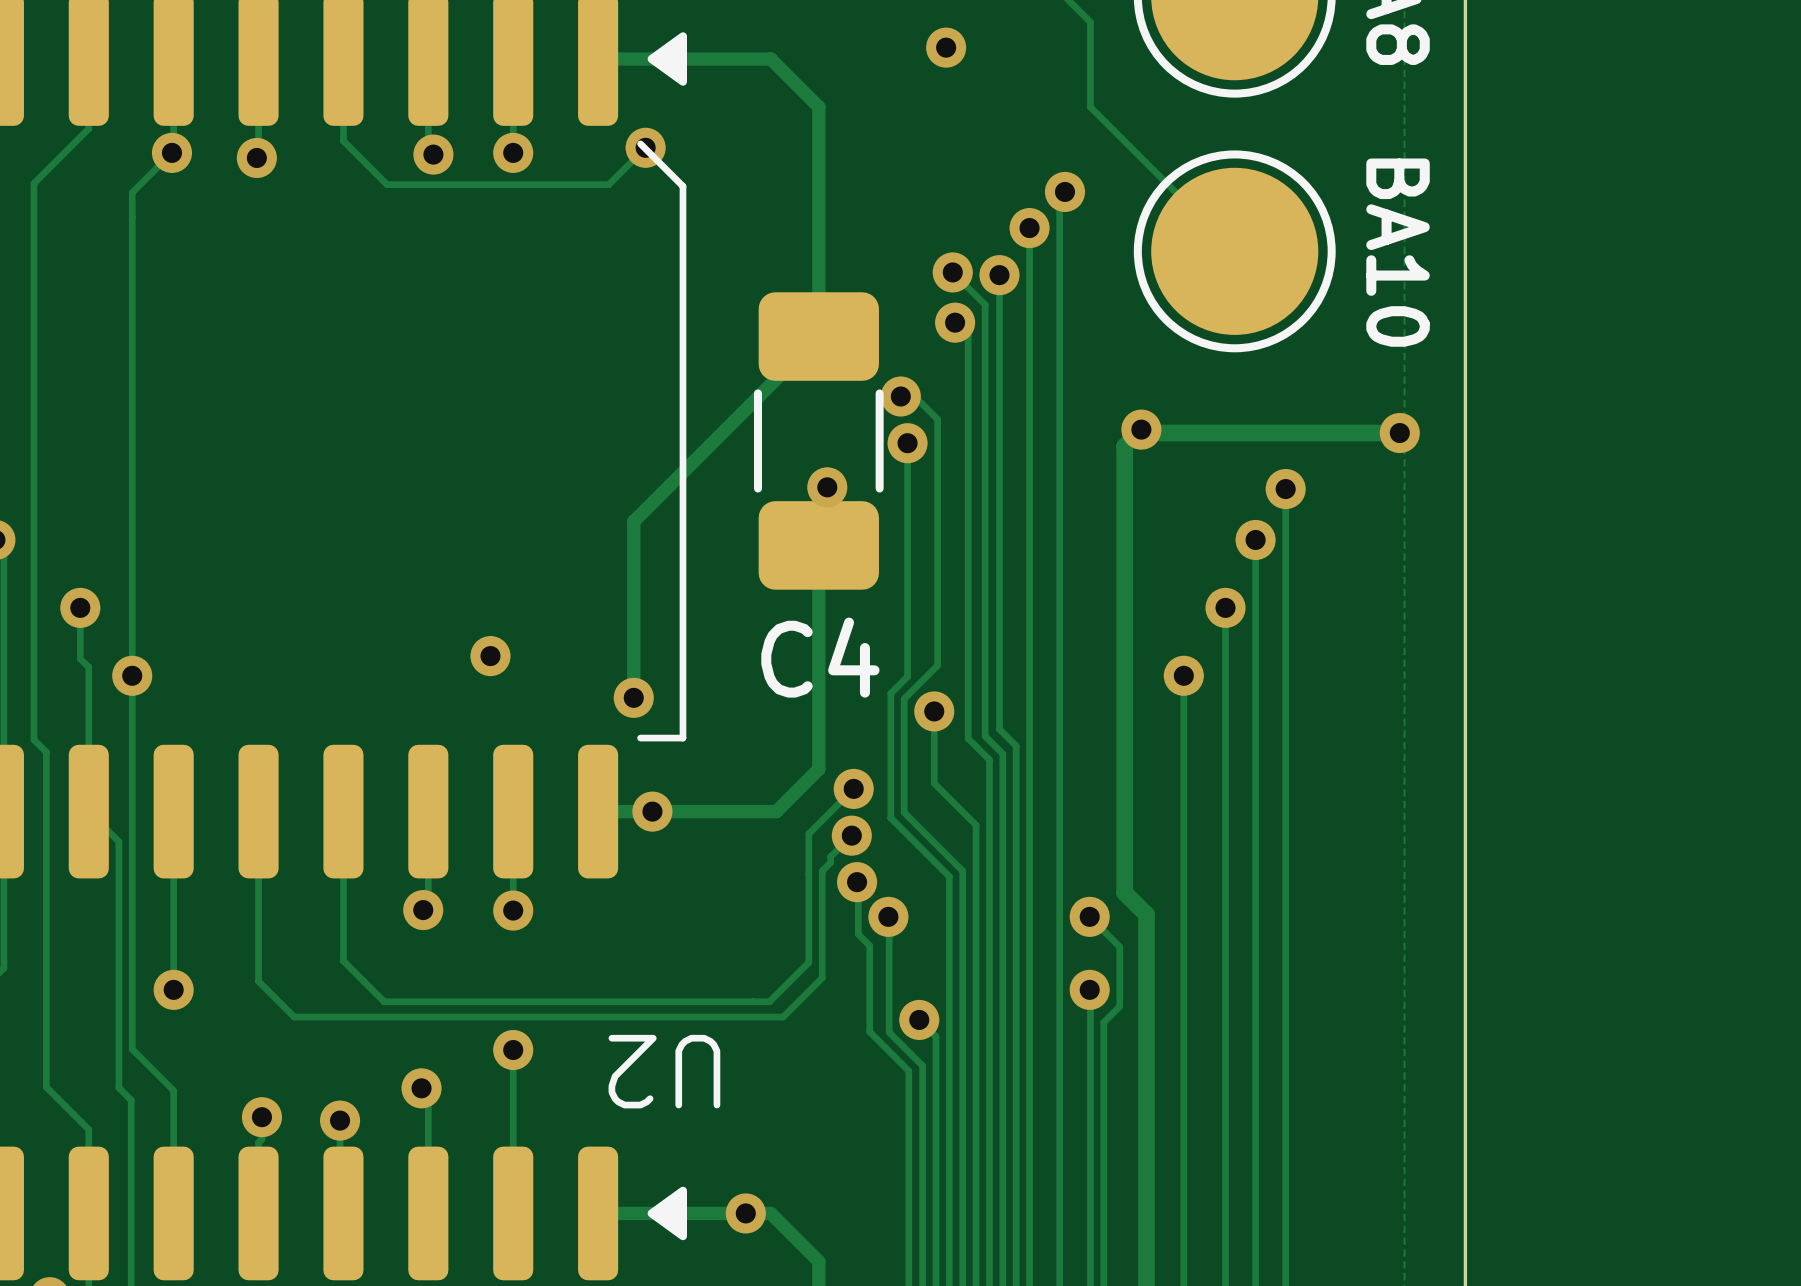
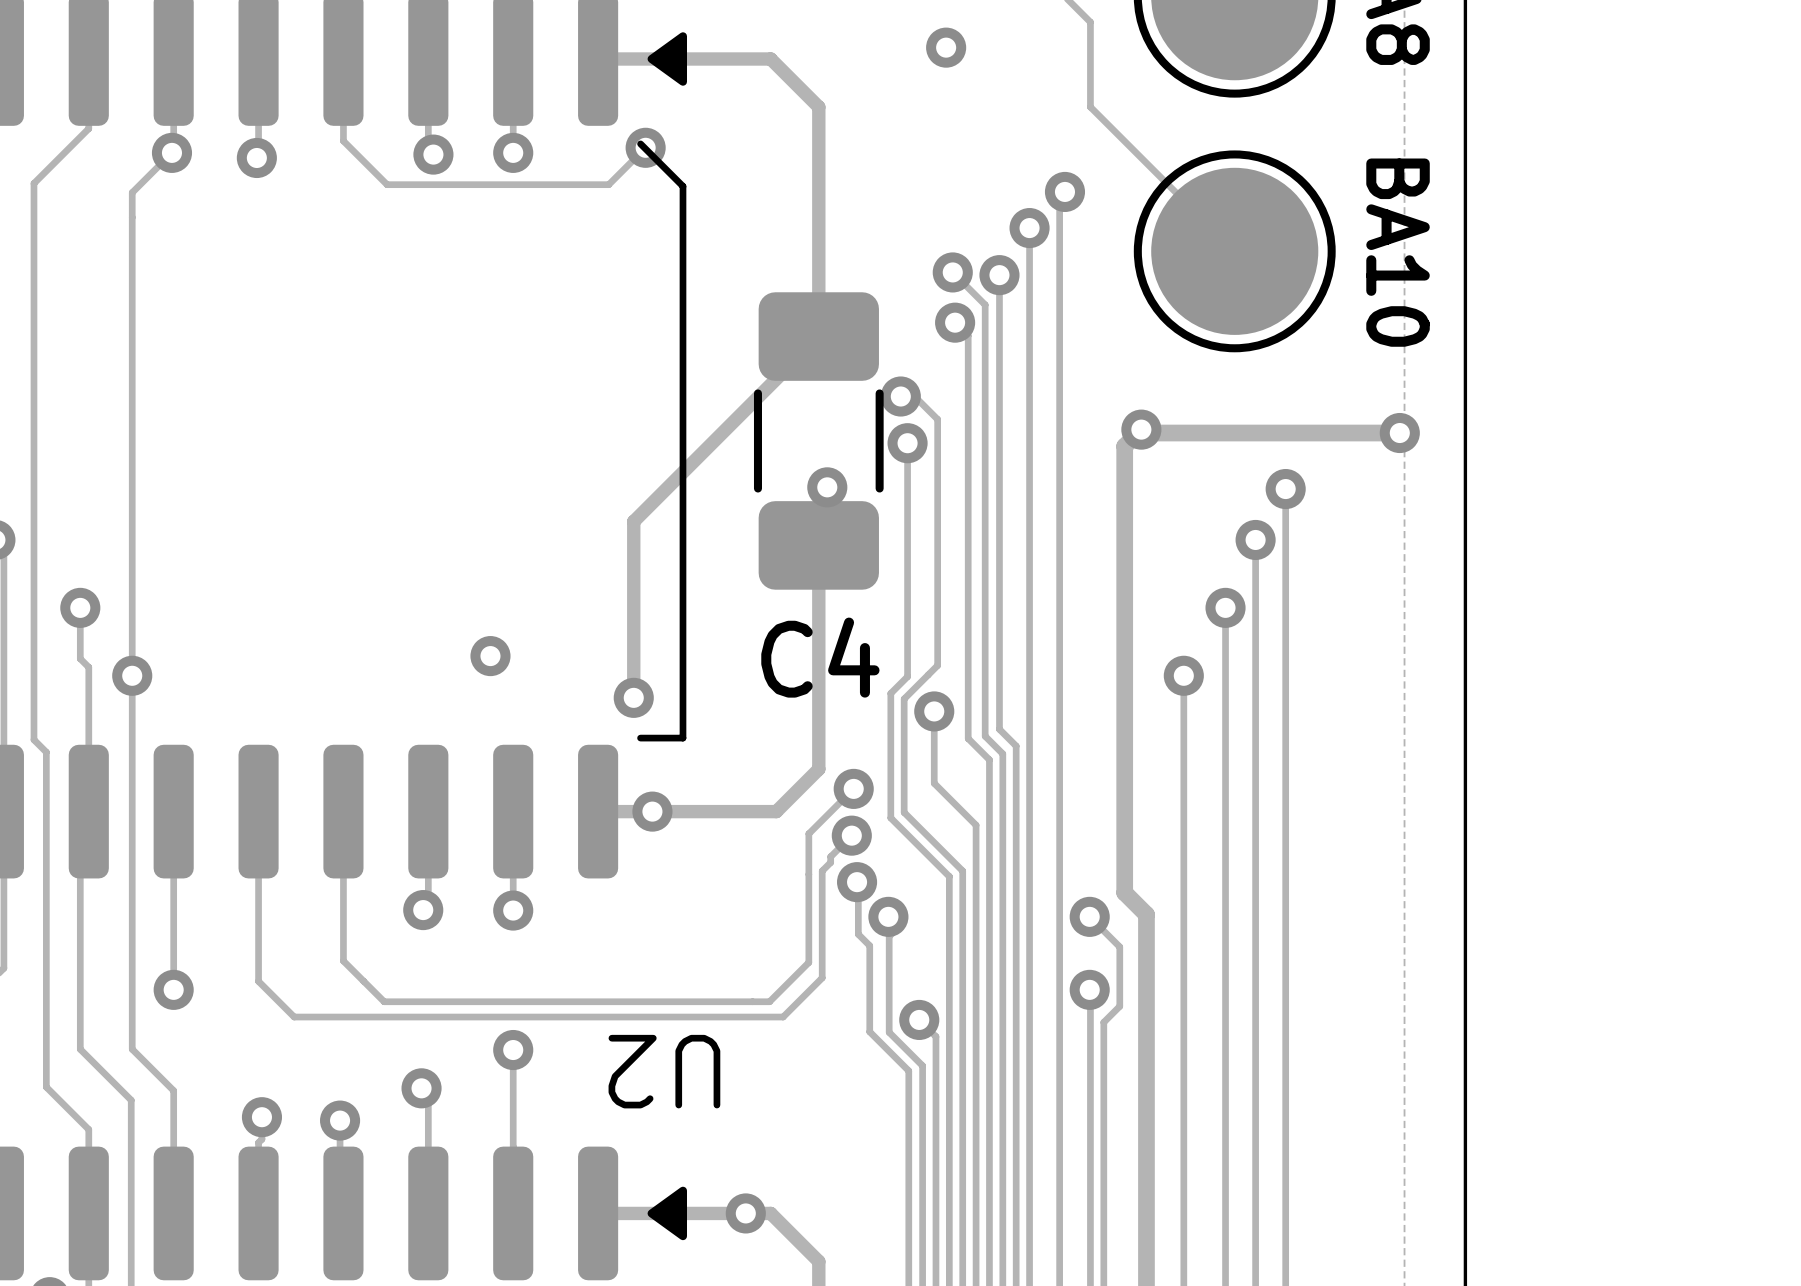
track: (88, 811) (118, 841) (118, 1087) -> (88, 811) (80, 820) (80, 1049) (118, 1087)

